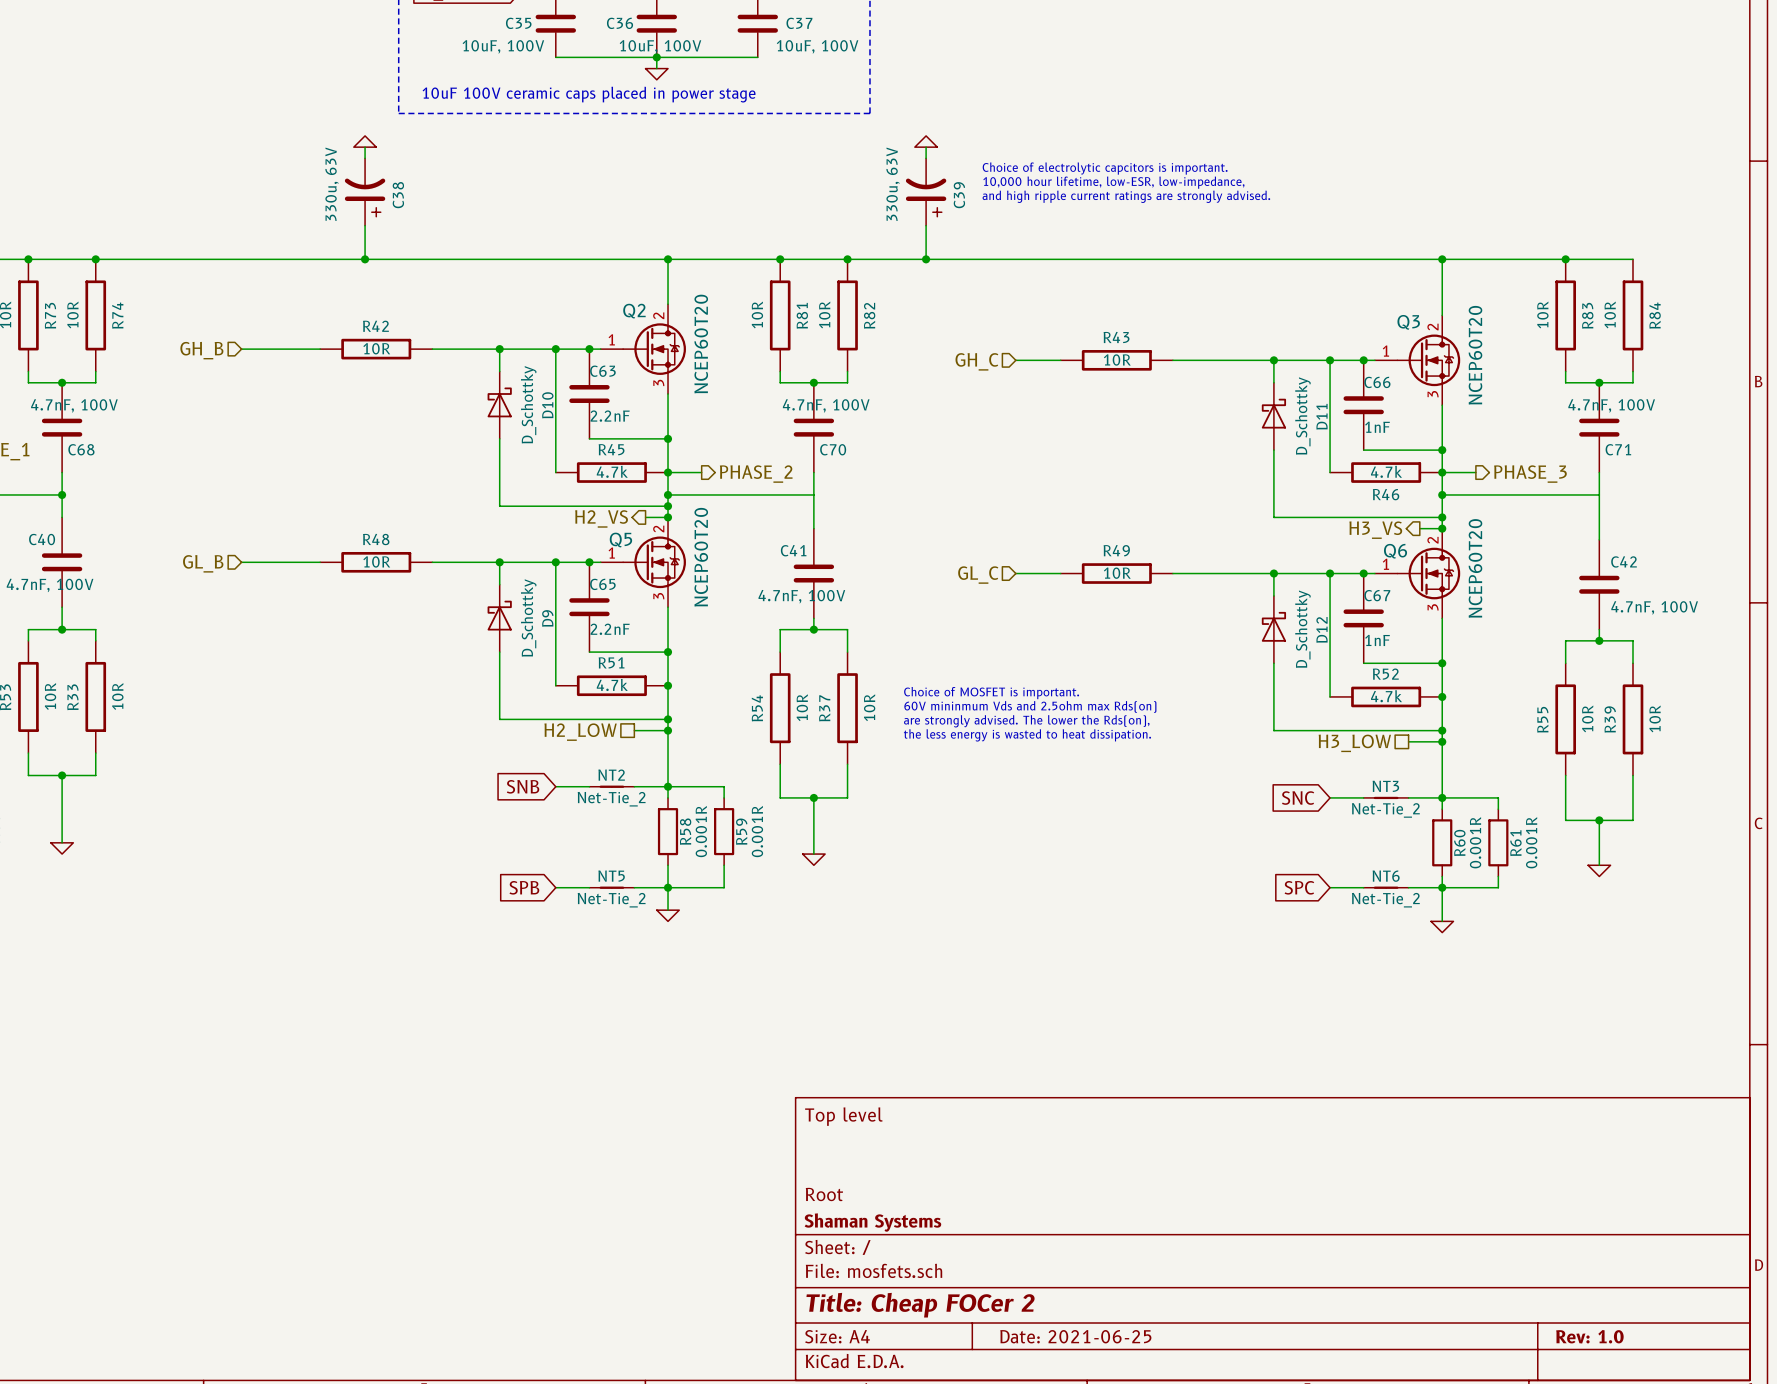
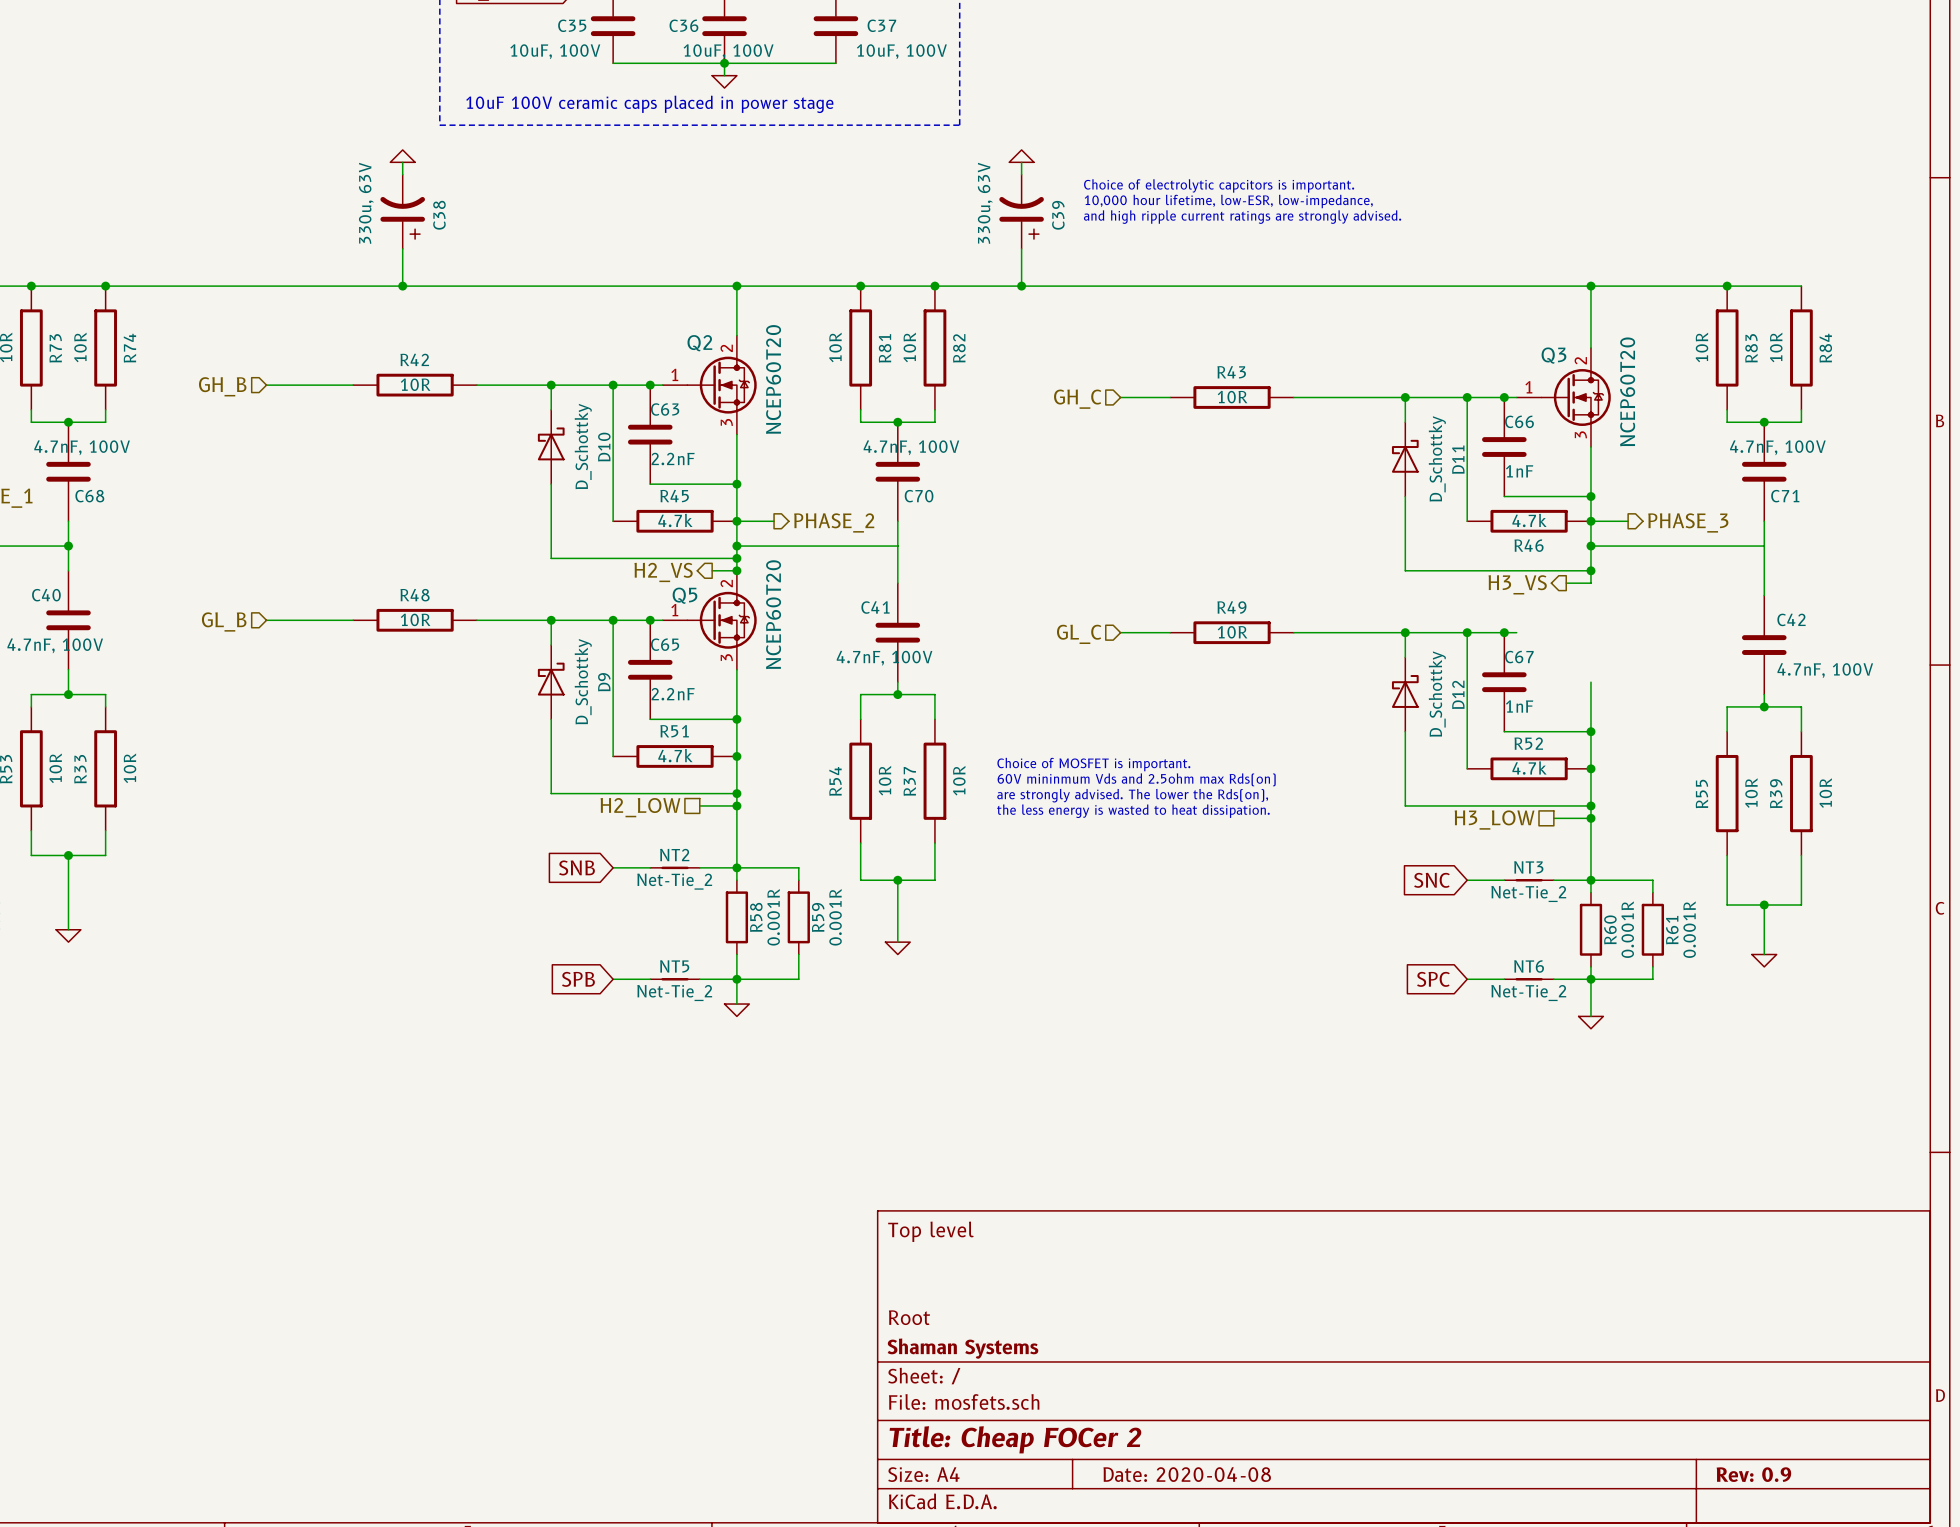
junction: (1442, 528) -> none
Q6: NCEP60T20 (1417, 573) -> none
title block: Date: 2021-06-25 (1075, 1336) -> Date: 2020-04-08 (1187, 1474)
title block: Rev: 1.0 (1589, 1336) -> Rev: 0.9 (1753, 1474)

